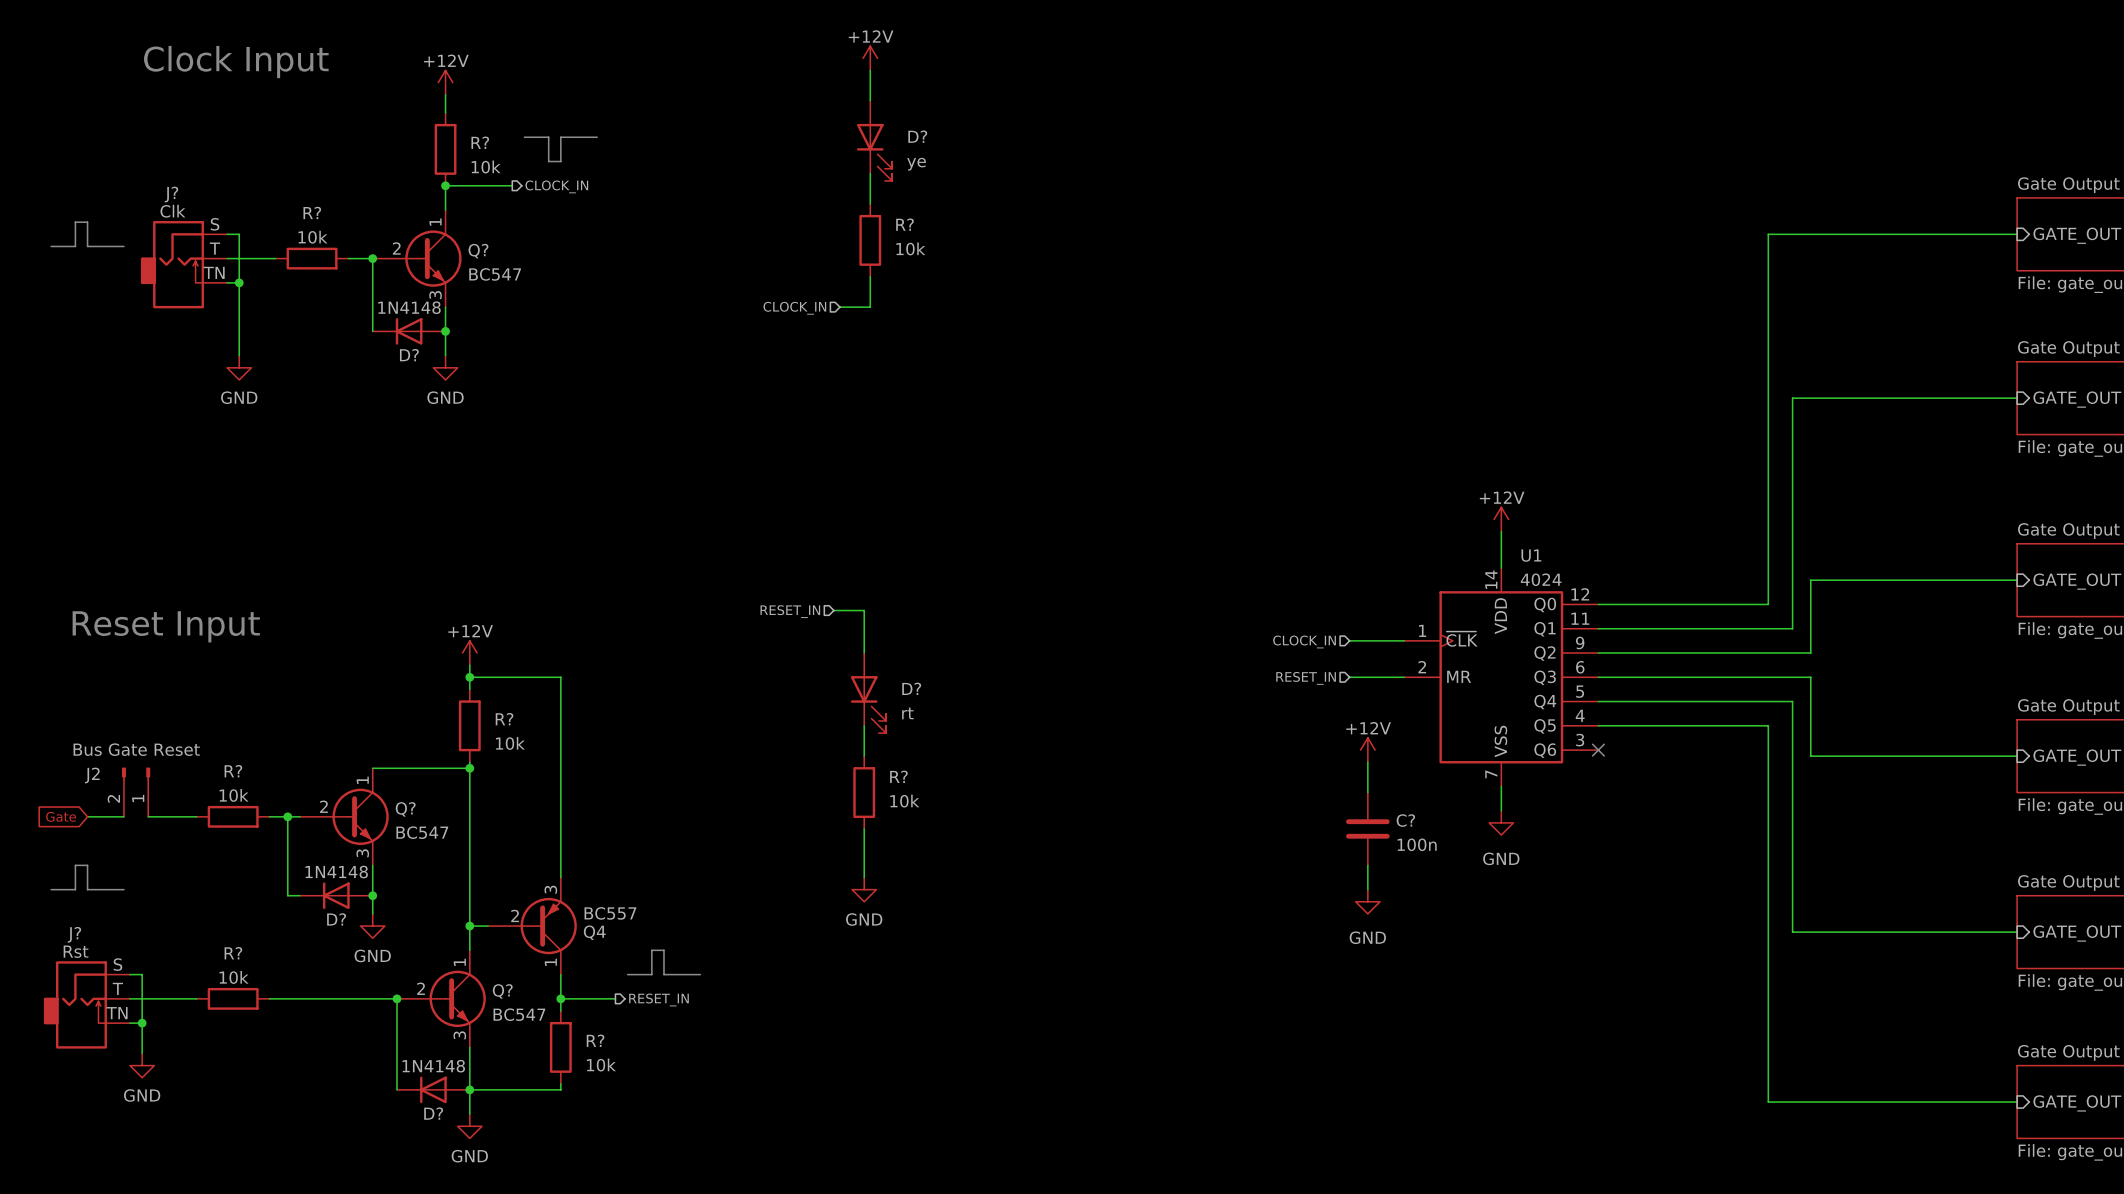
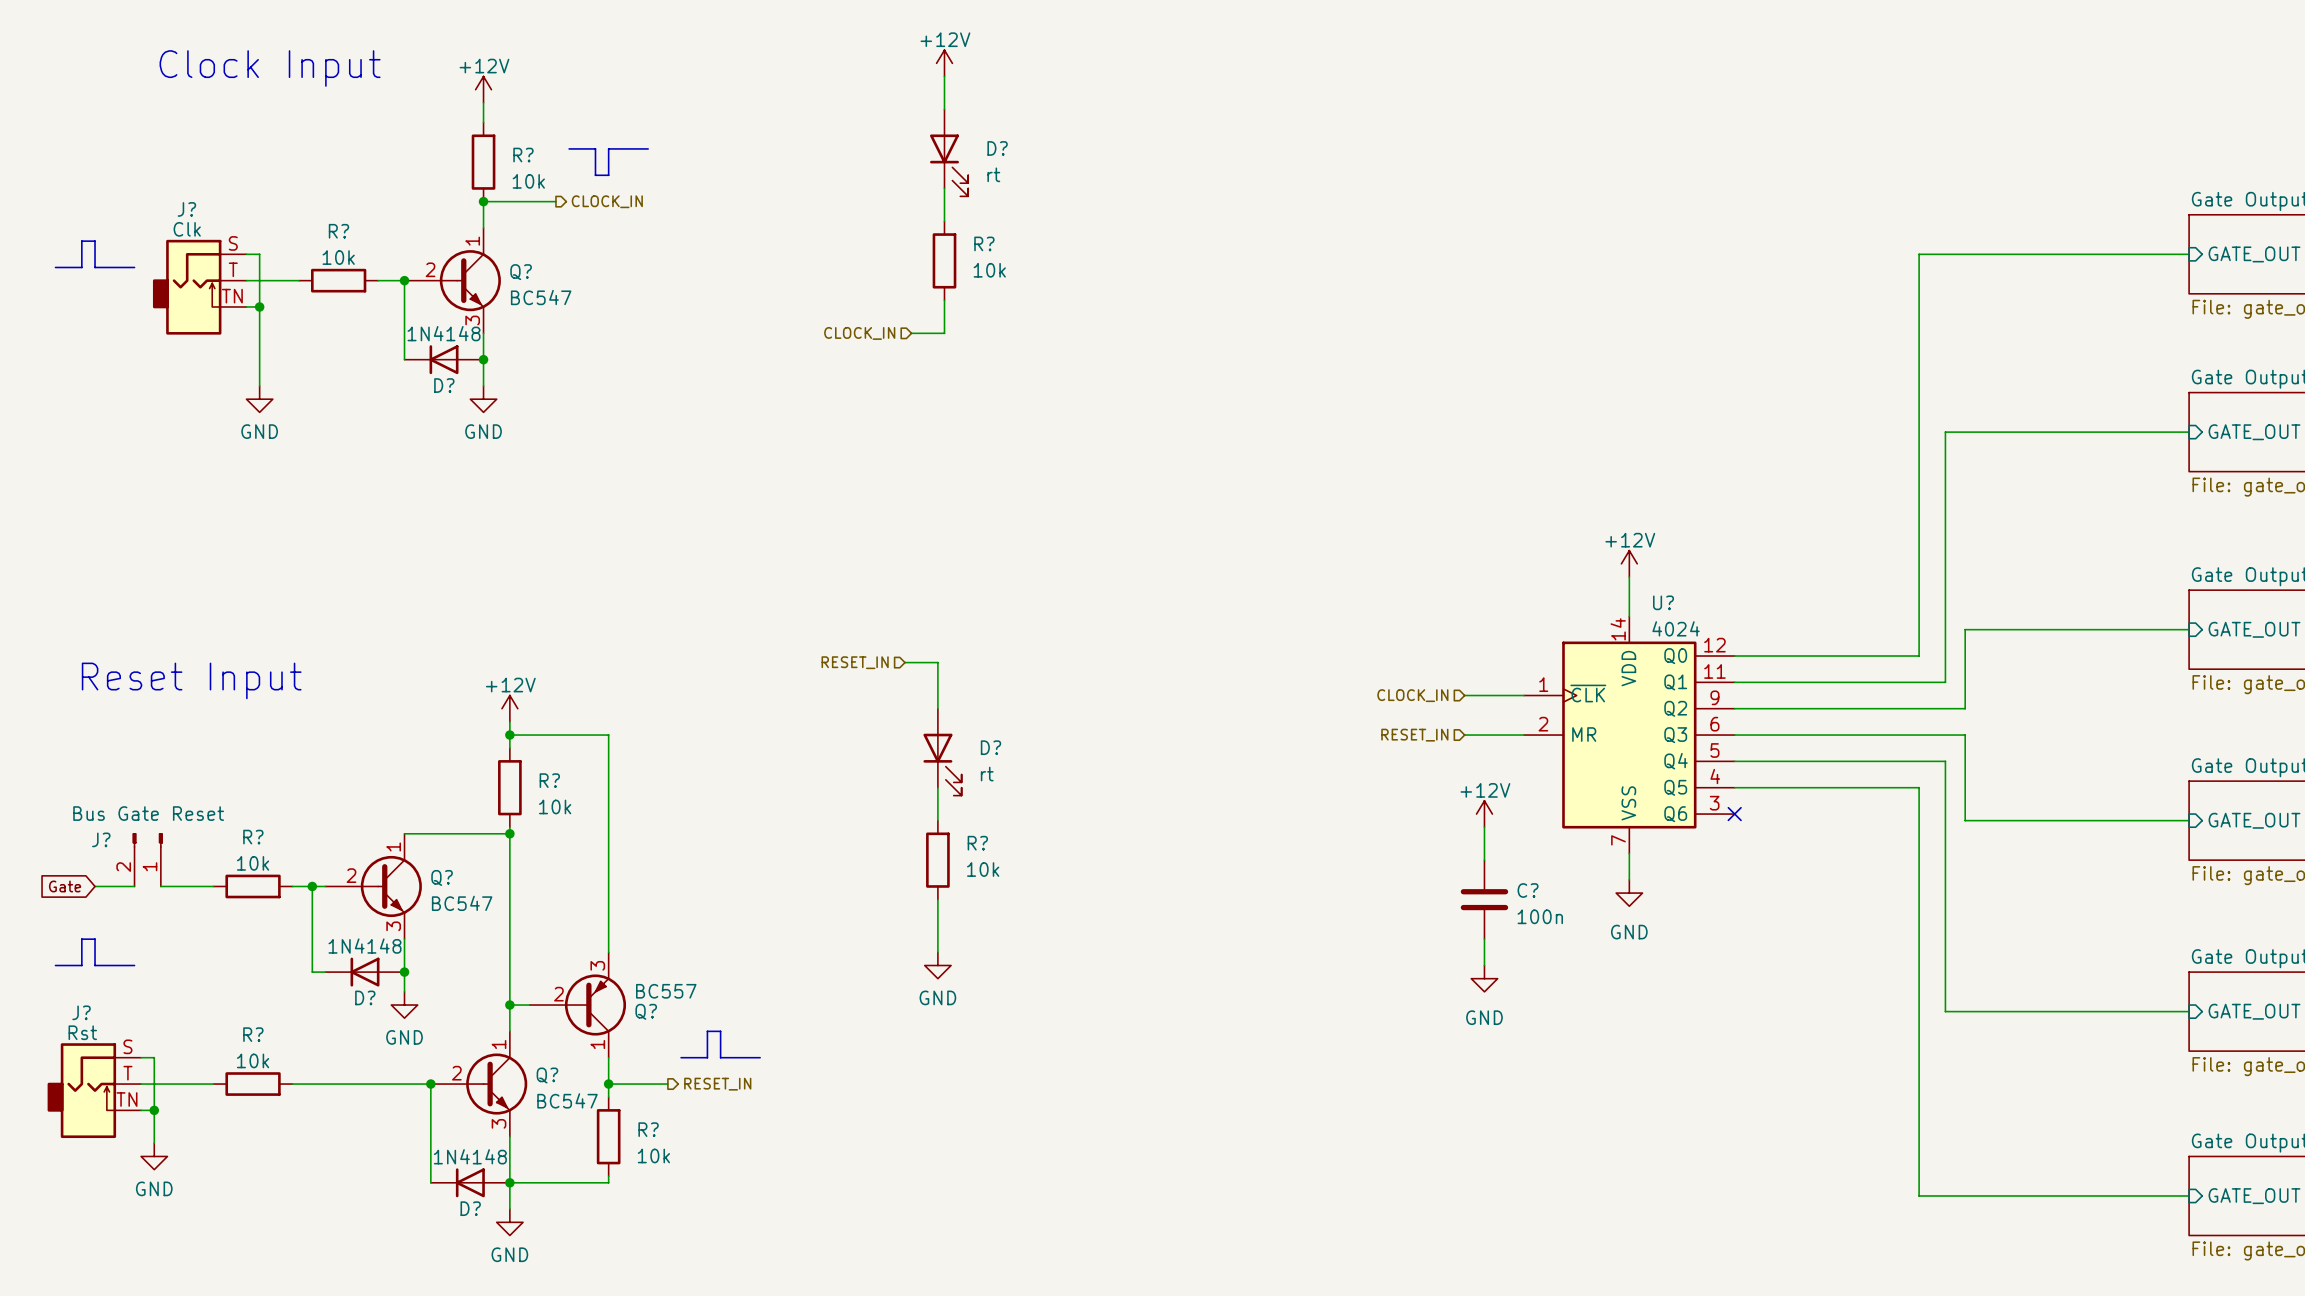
D? value: ye (916, 164) -> rt (993, 174)
U1 name: U1 (1531, 555) -> U? (1663, 602)
J2 name: J2 (92, 775) -> J? (101, 839)
Q4 name: Q4 (594, 932) -> Q? (646, 1011)

